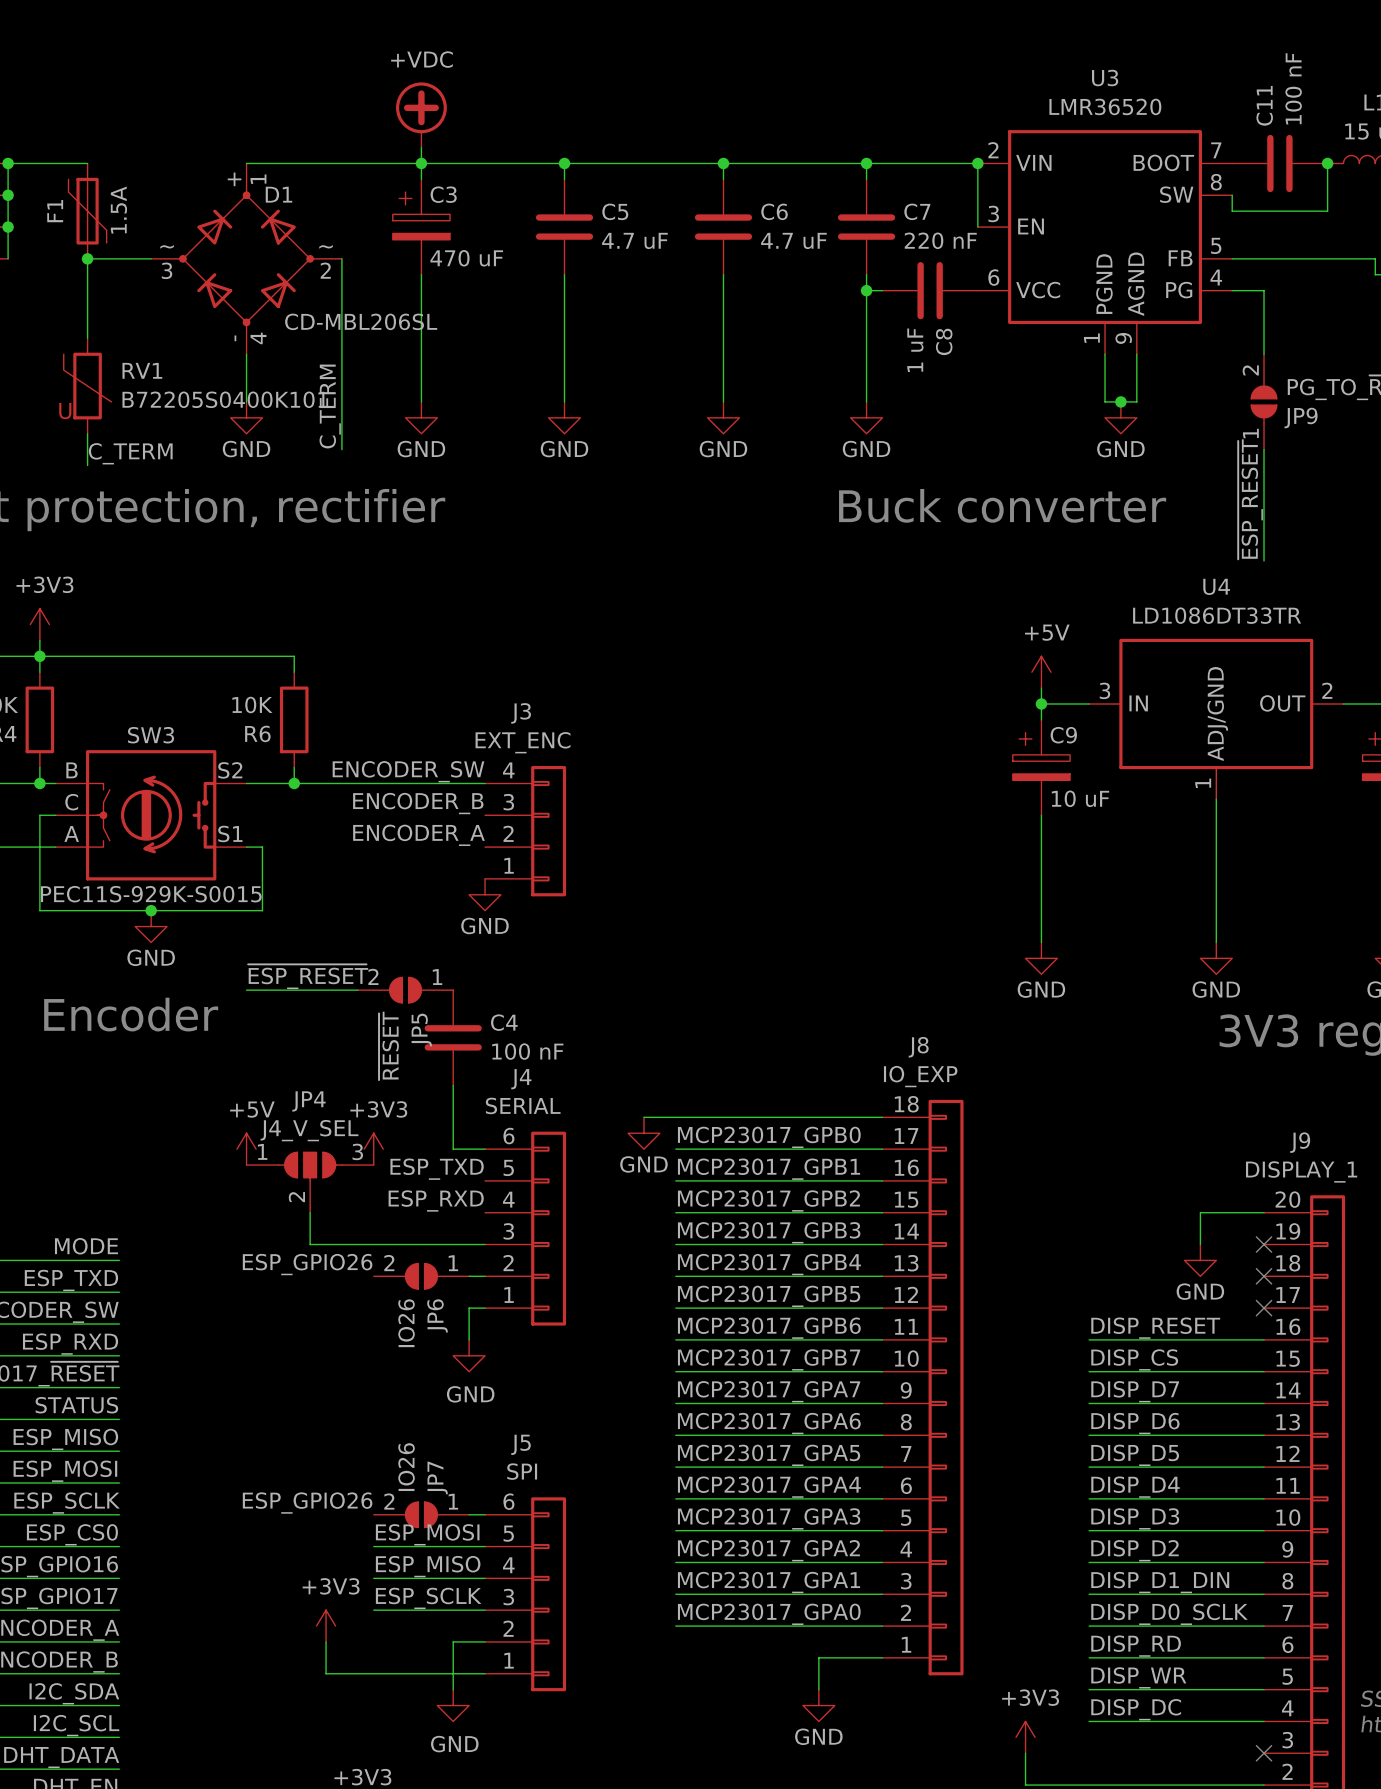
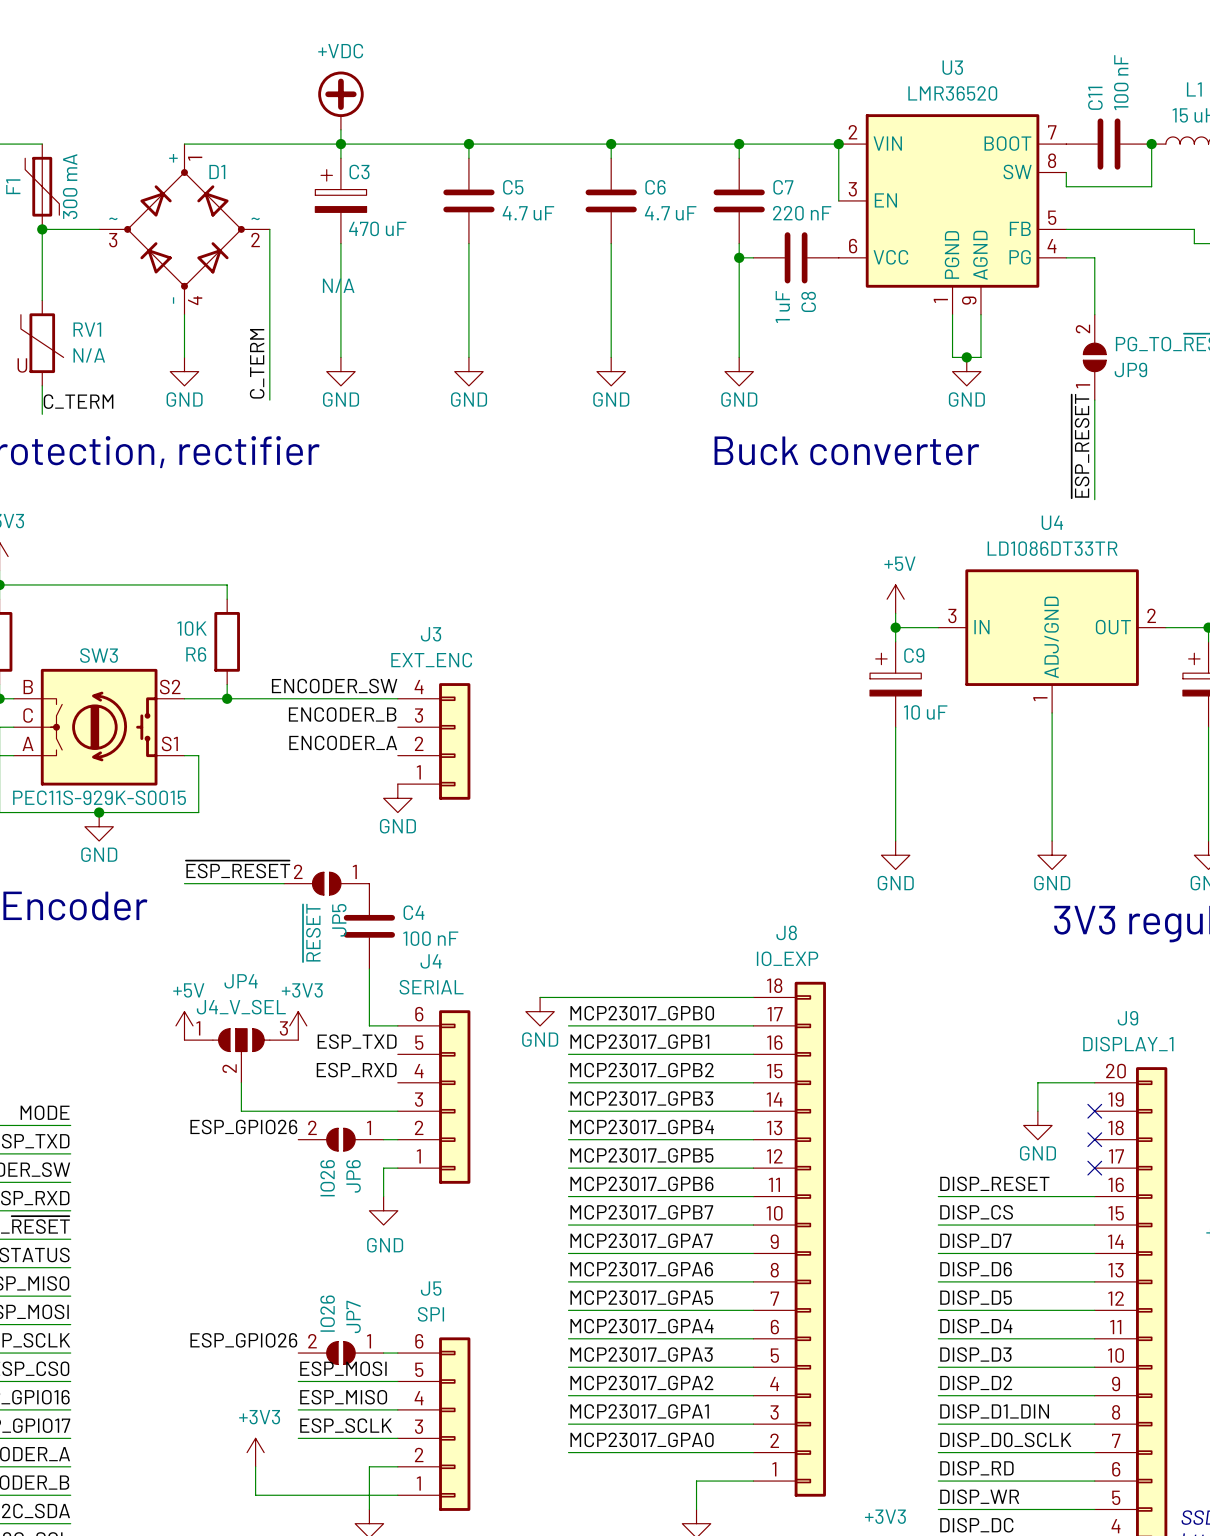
F1 value: 1.5A (118, 210) -> 300 mA (70, 186)
D1 value: CD-MBL206SL (361, 321) -> N/A (338, 285)
RV1 value: B72205S0400K101 (225, 399) -> N/A (89, 355)

